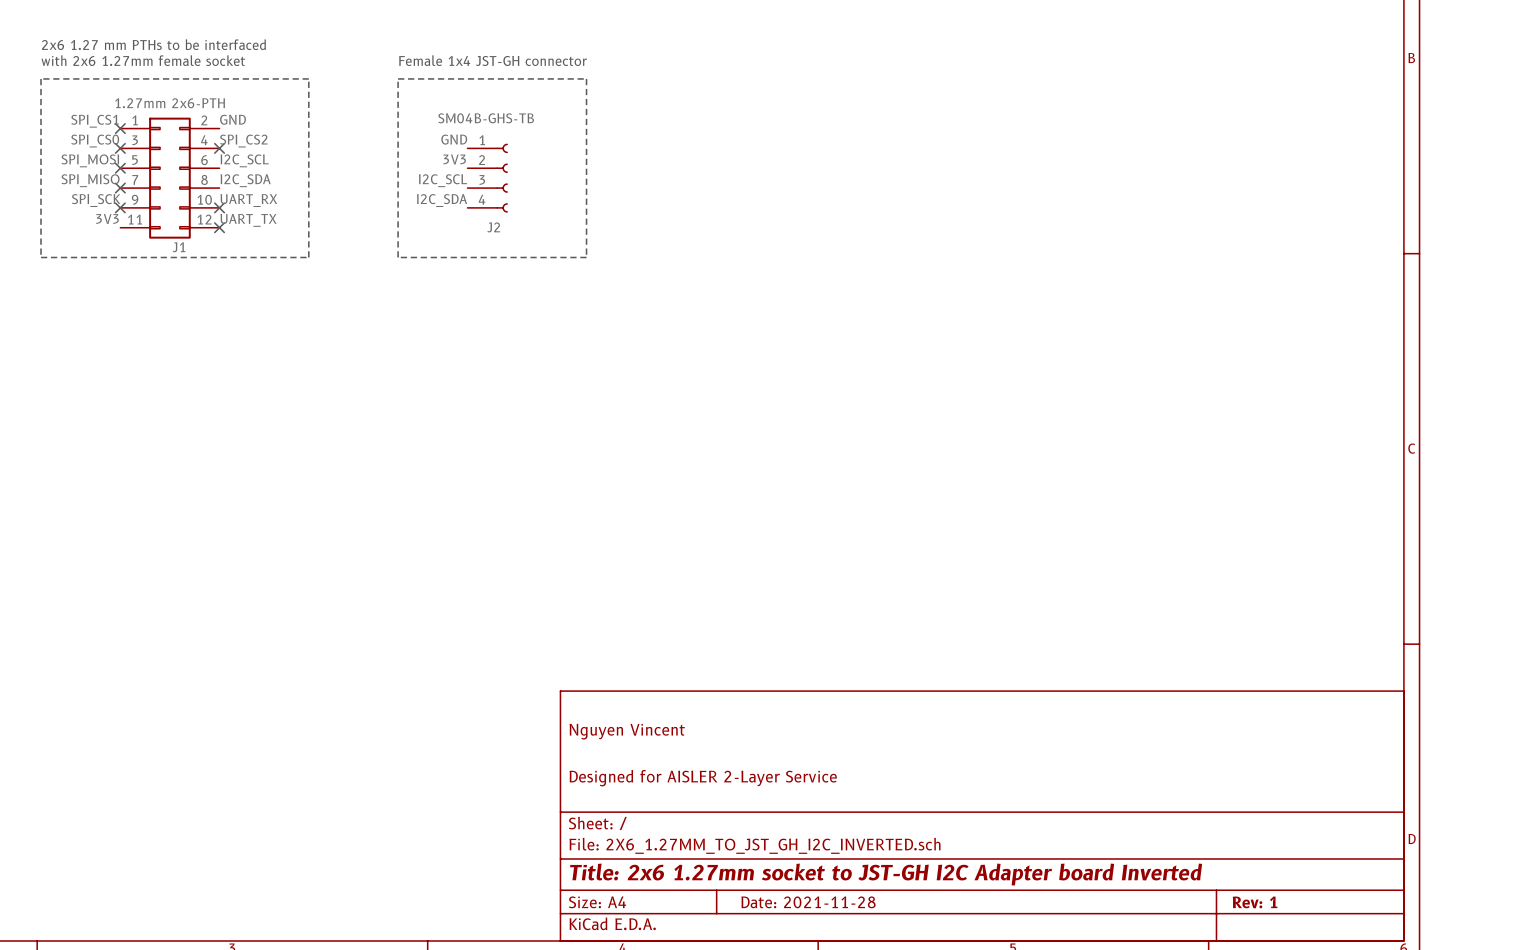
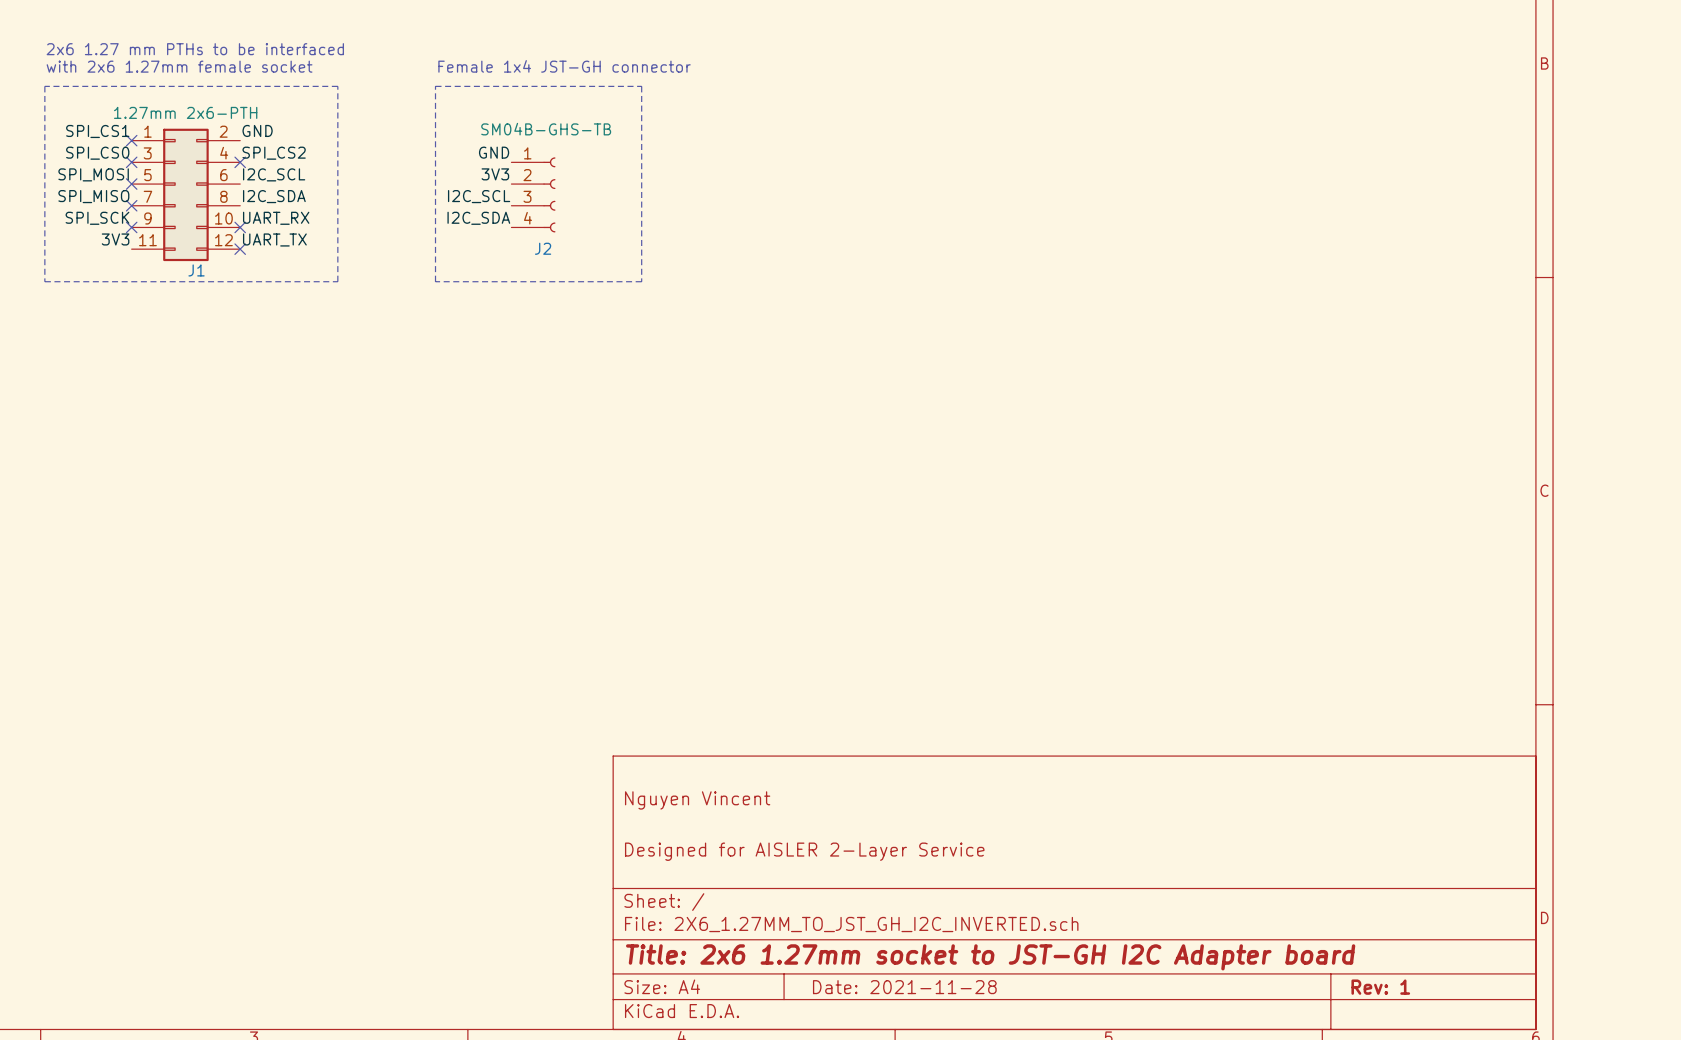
title block: Title: 2x6 1.27mm socket to JST-GH I2C Adapter board Inverted (886, 874) -> Title: 2x6 1.27mm socket to JST-GH I2C Adapter board (990, 957)

